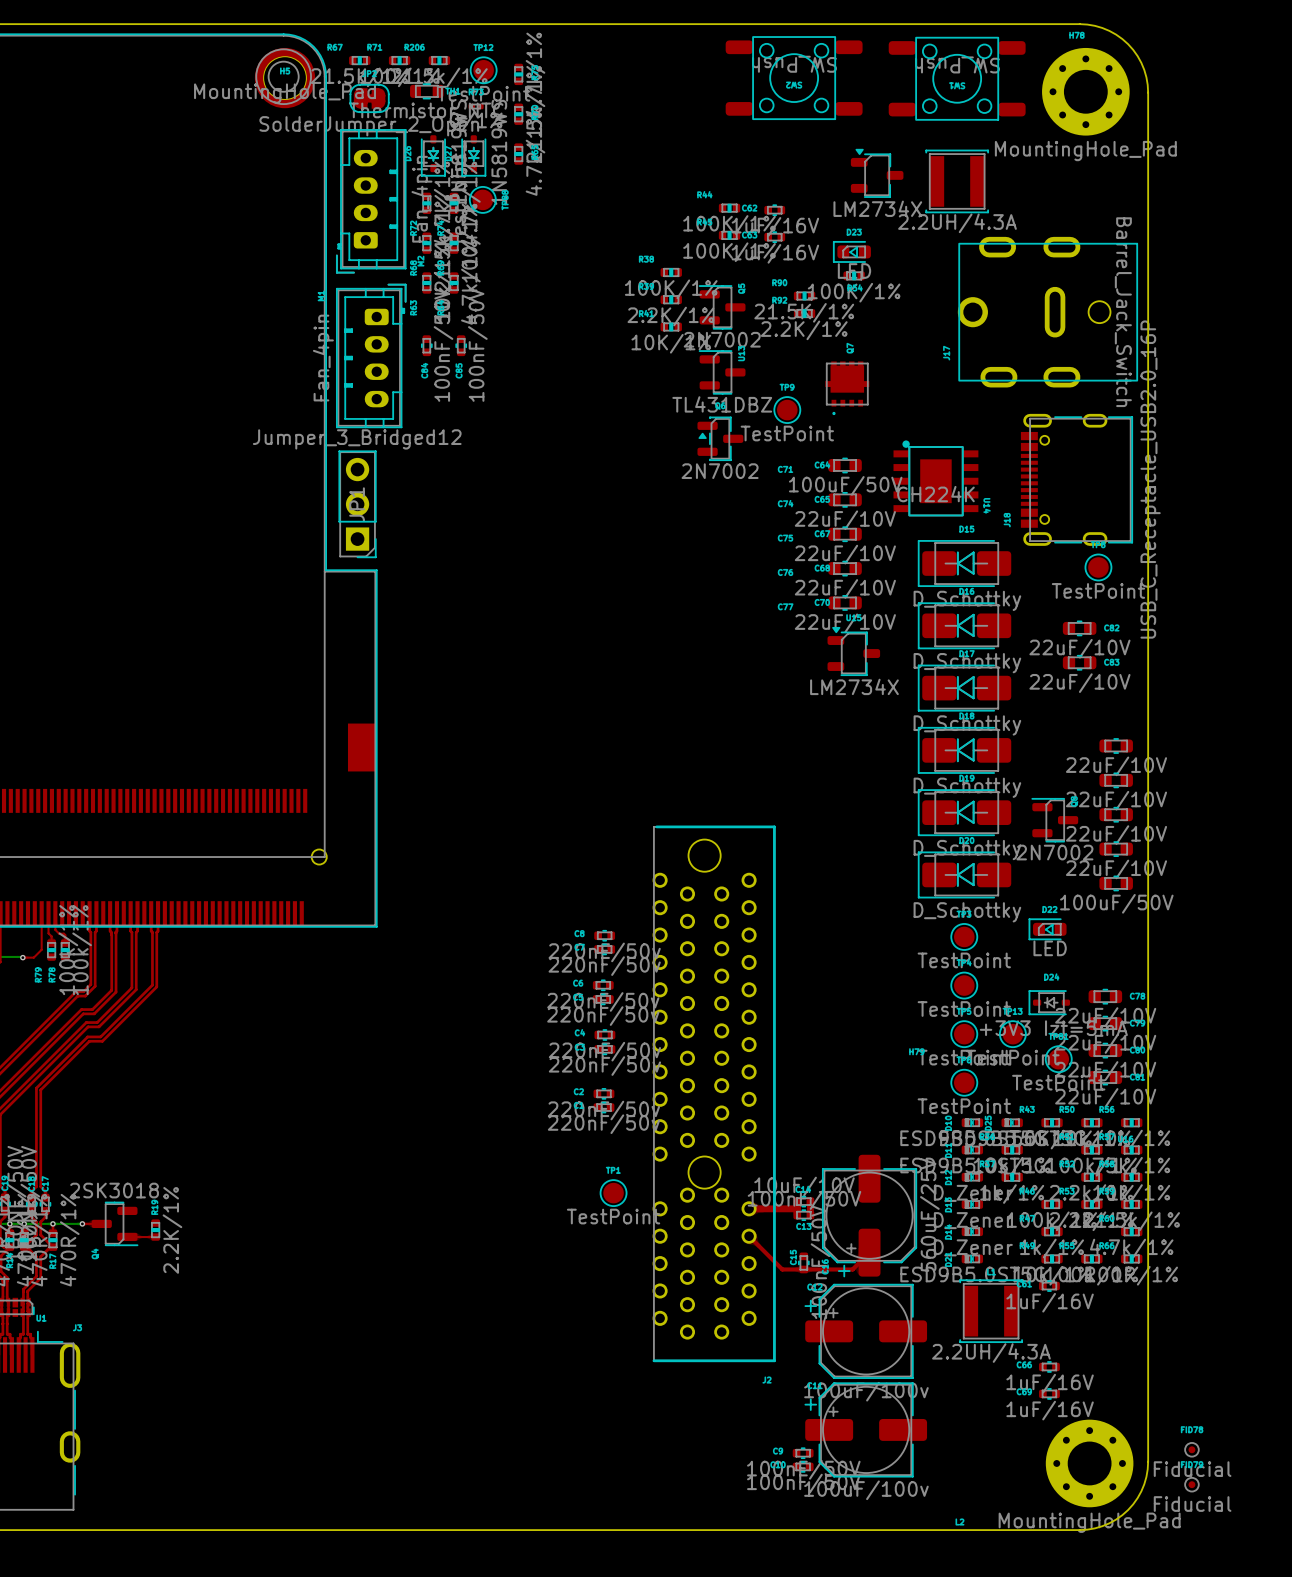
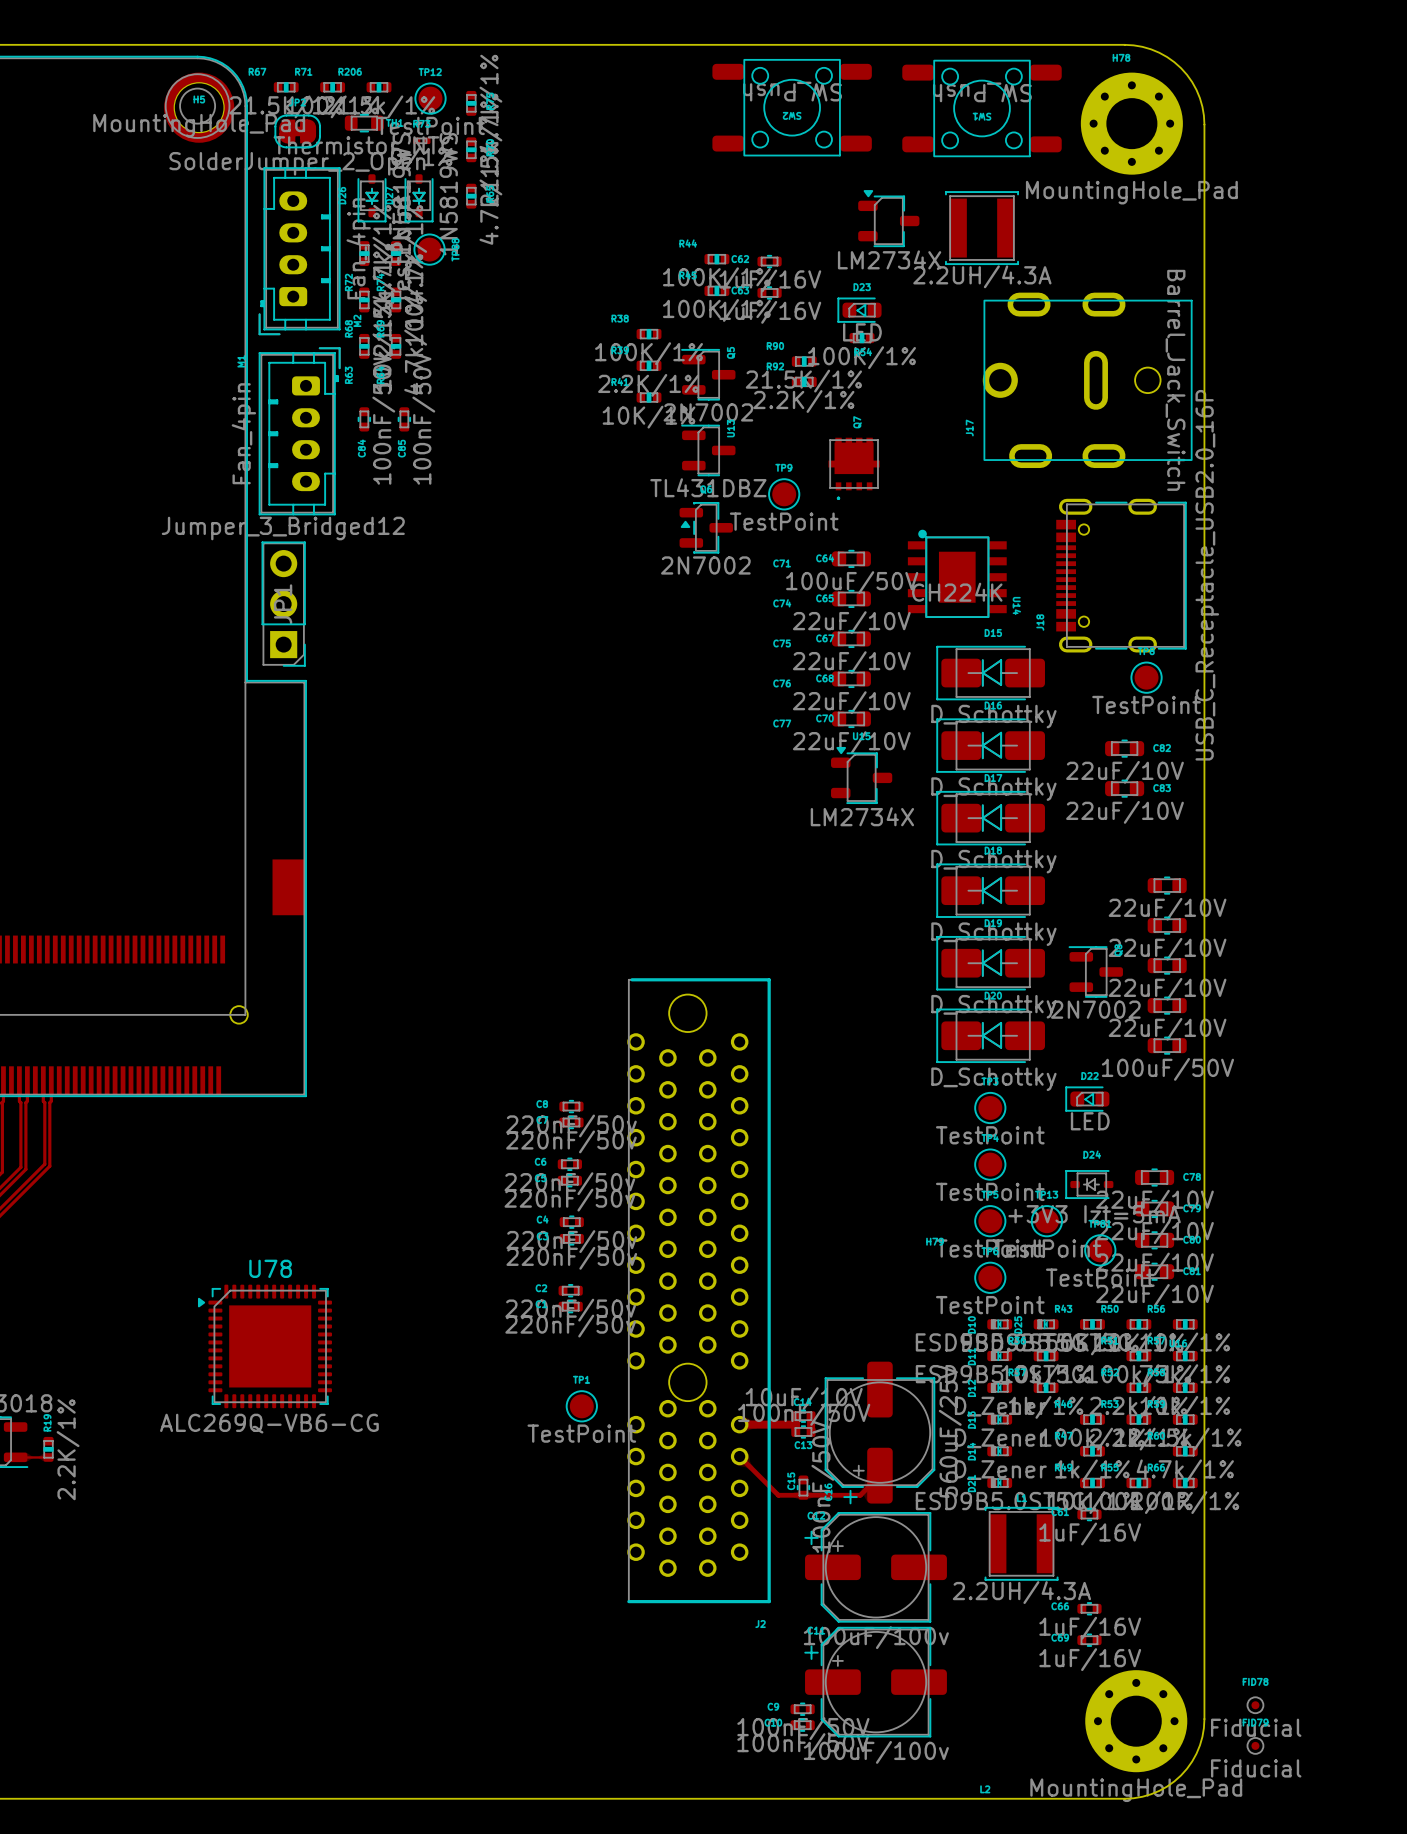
U78: none -> ALC269Q-VB6-CG (264, 1346)

